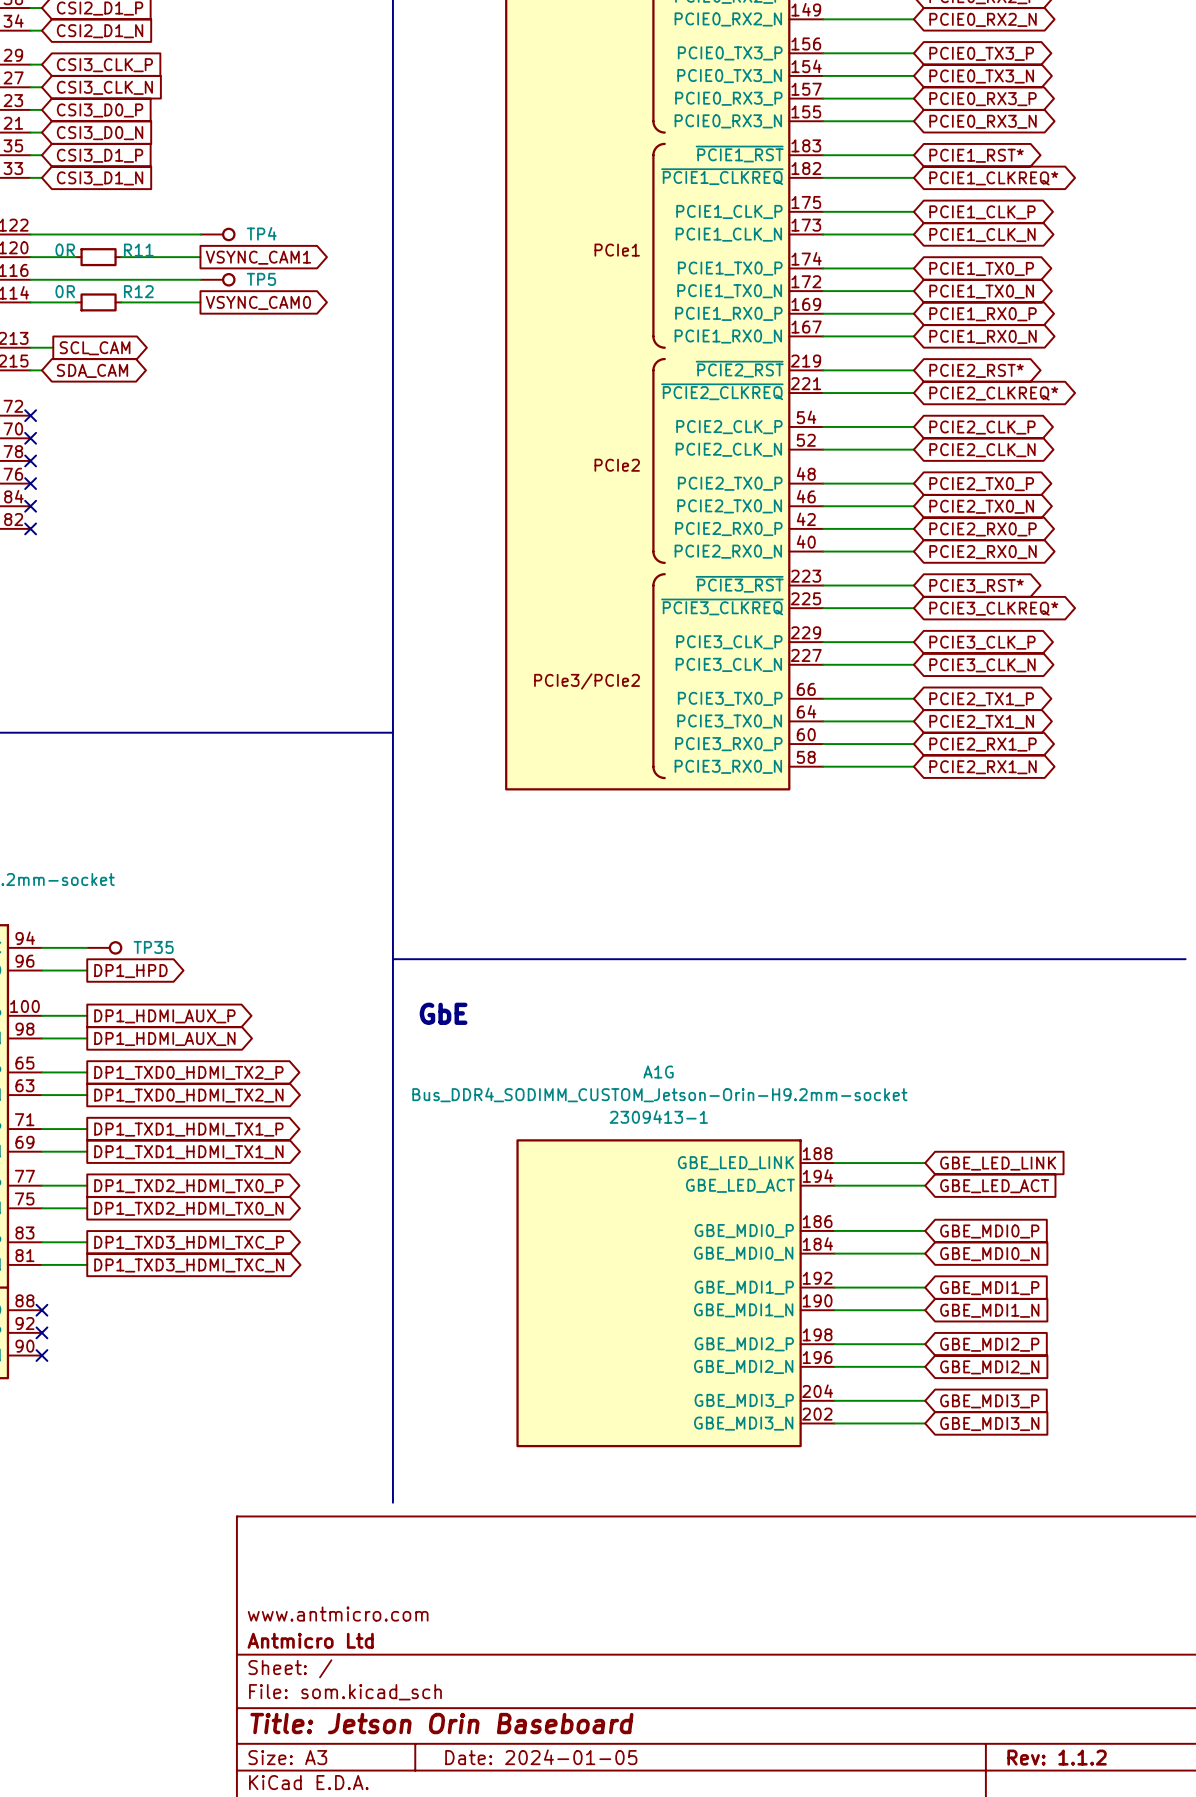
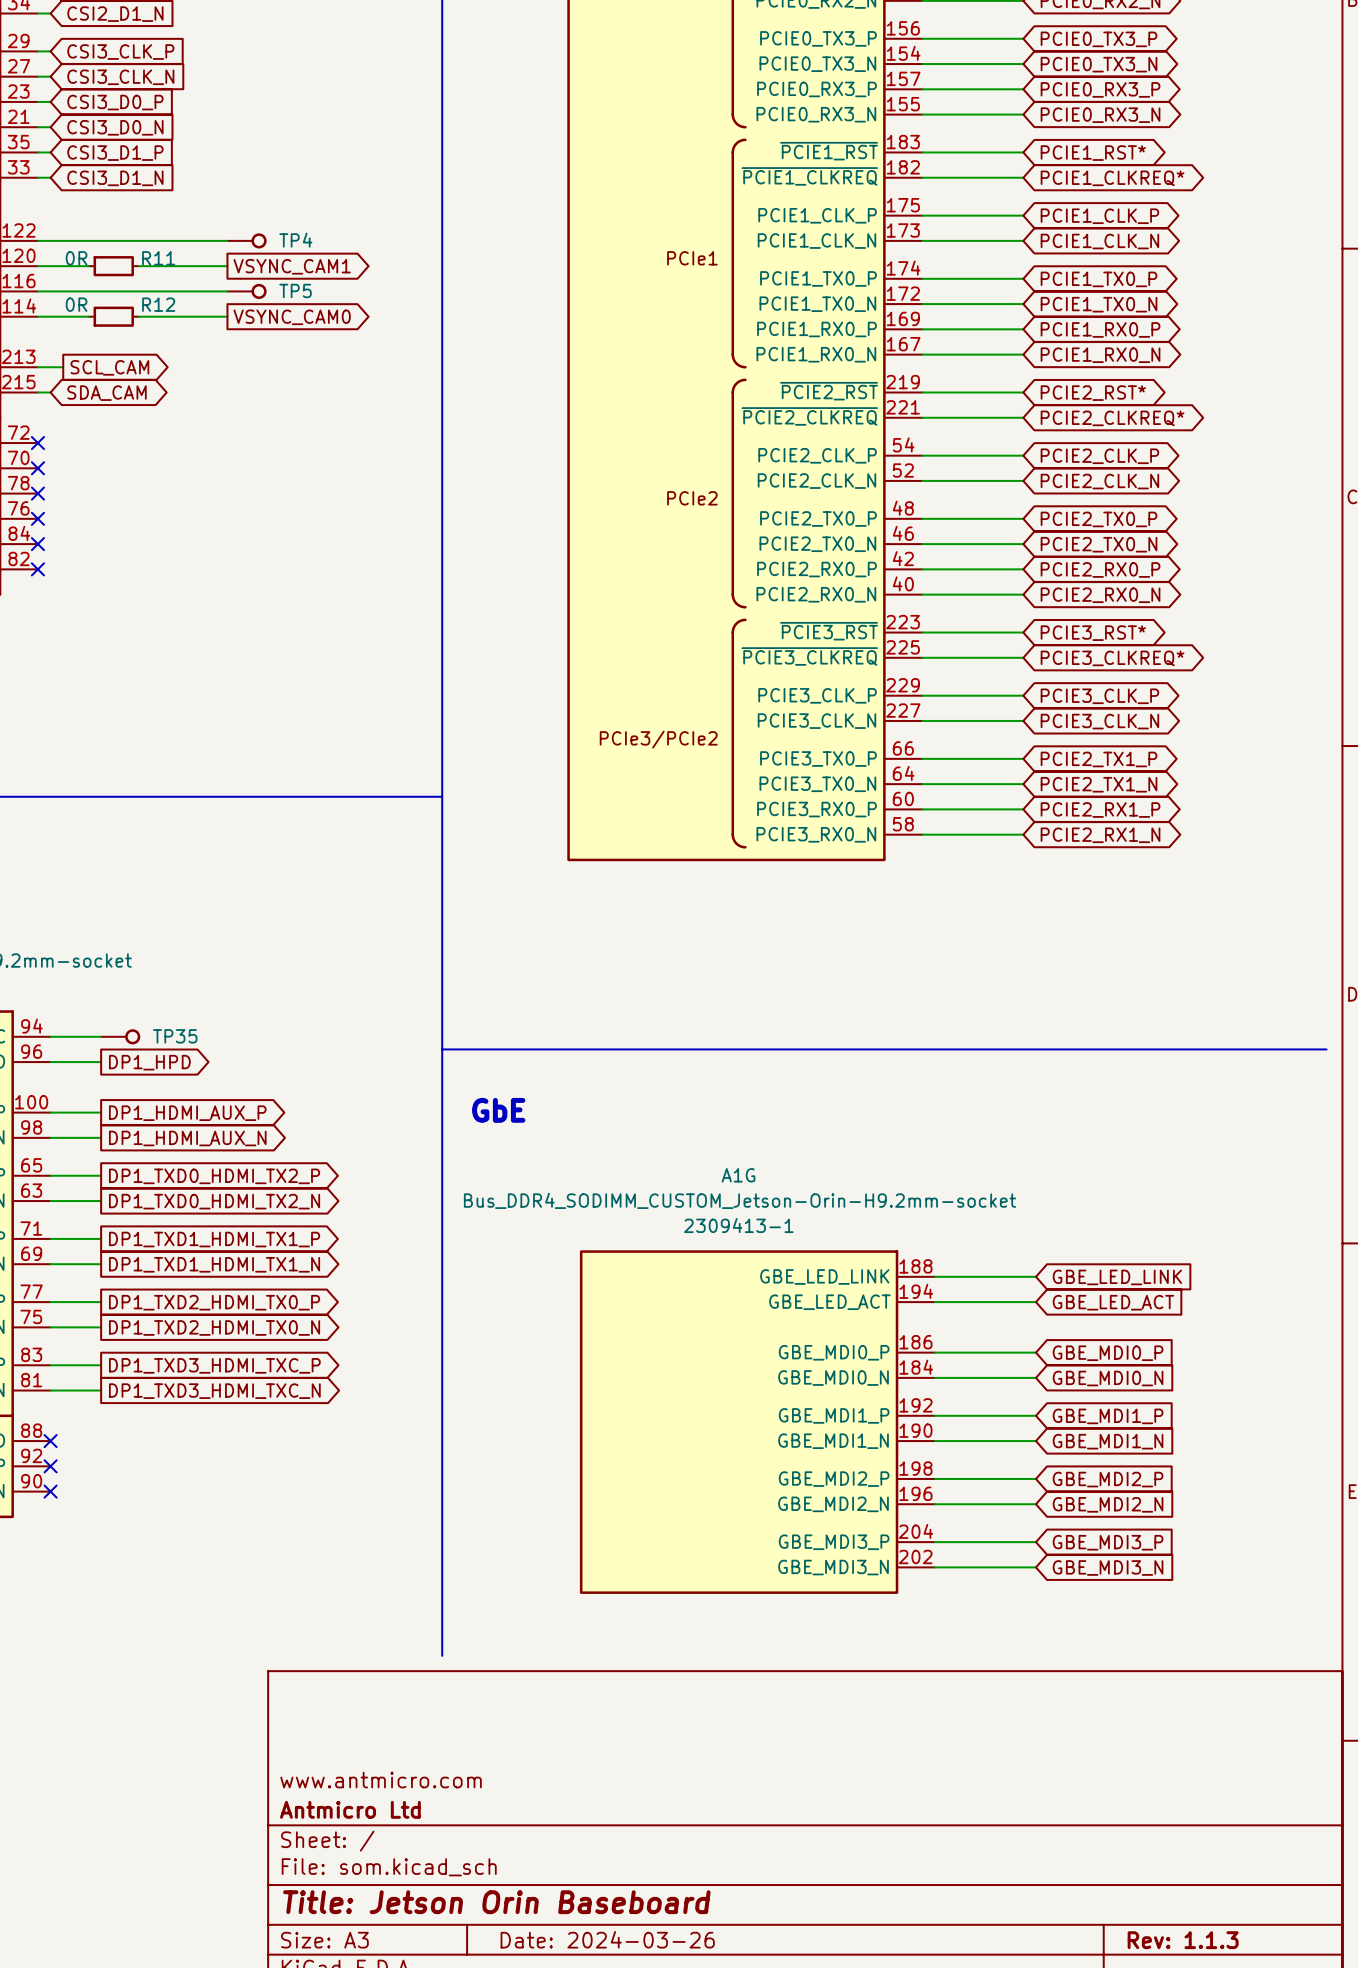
title block: Date: 2024-01-05 (541, 1757) -> Date: 2024-03-26 (607, 1939)
title block: Rev: 1.1.2 (1057, 1757) -> Rev: 1.1.3 (1183, 1940)

